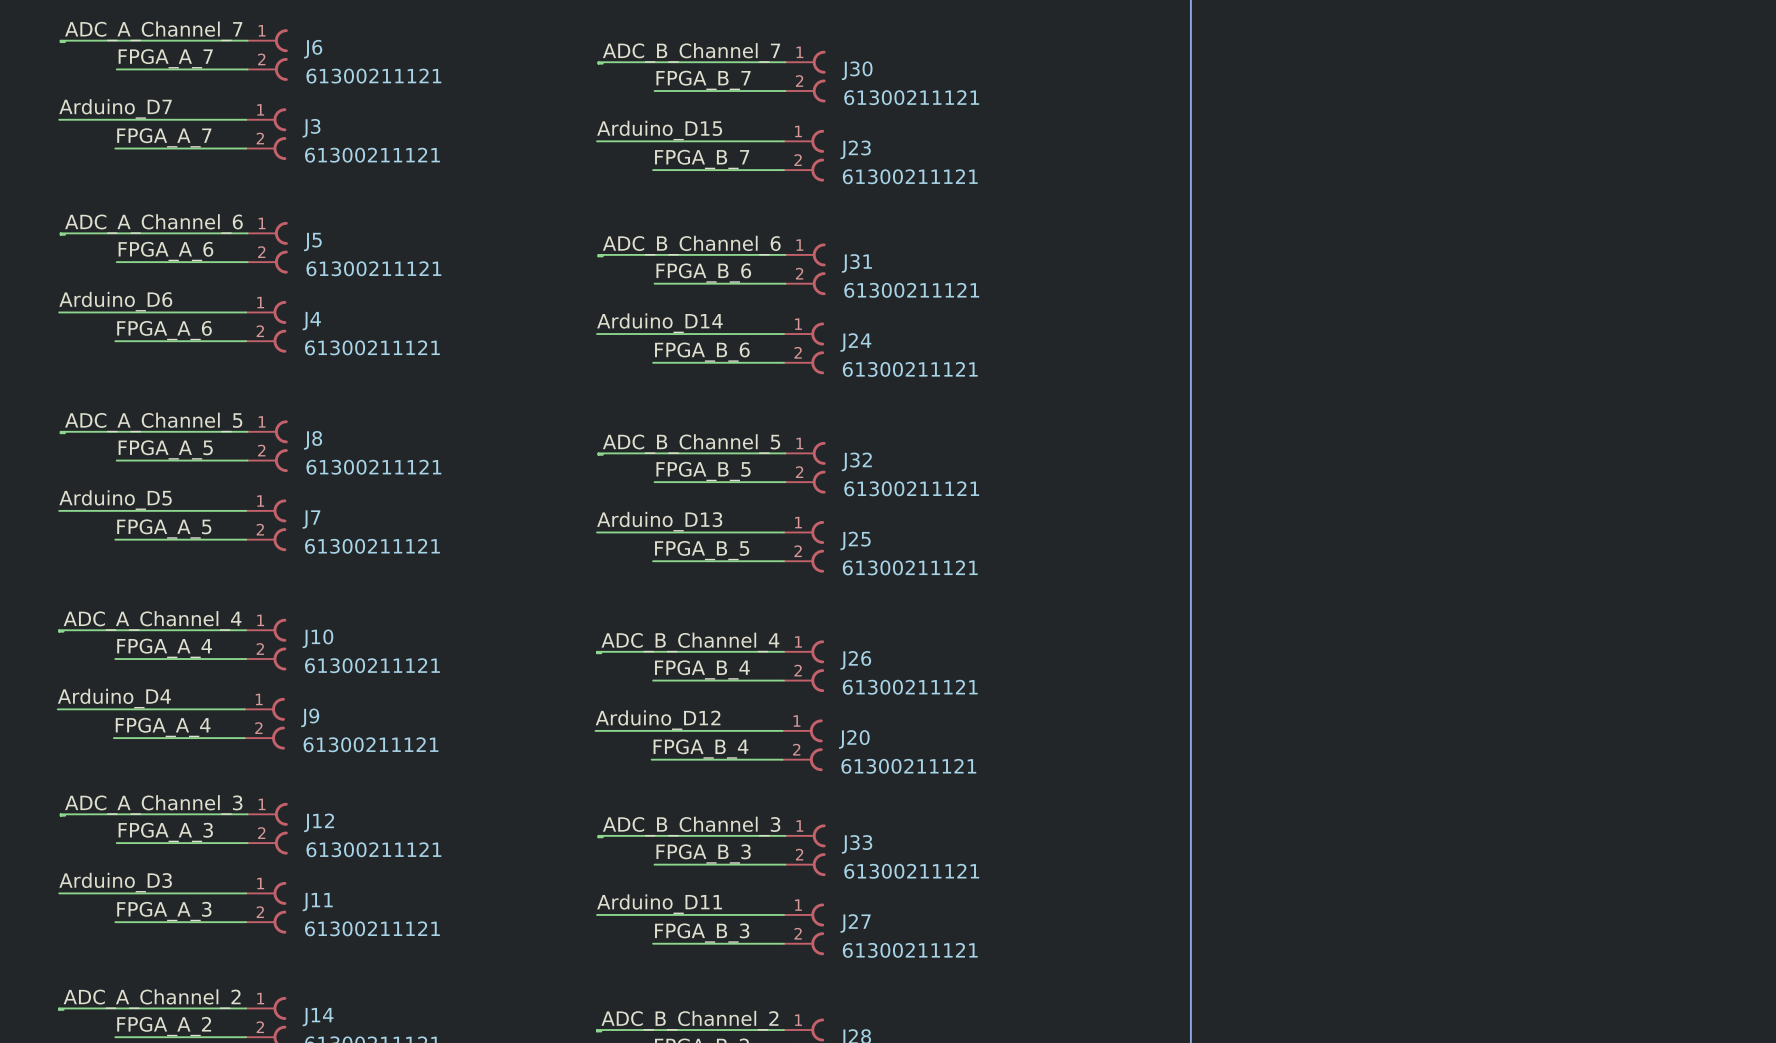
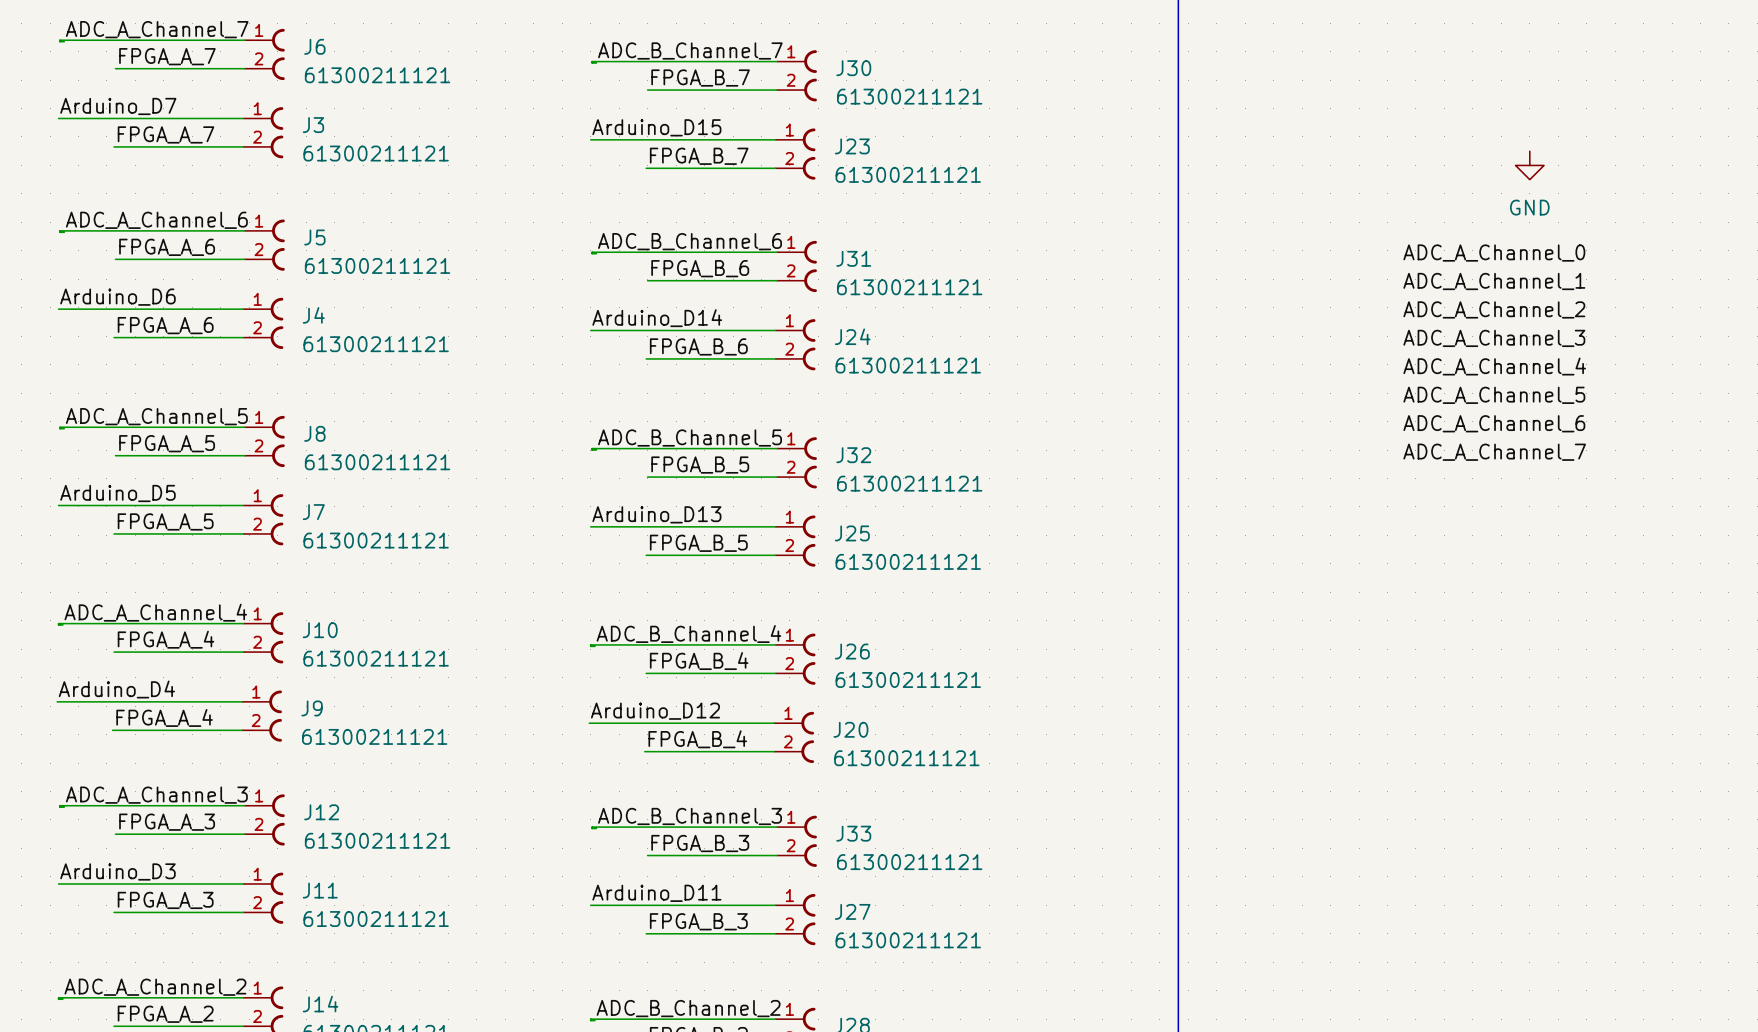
power symbol: none -> GND (1529, 165)
label: none -> ADC_A_Channel_0 (1494, 253)
label: none -> ADC_A_Channel_1 (1494, 281)
label: none -> ADC_A_Channel_2 (1494, 309)
label: none -> ADC_A_Channel_3 (1494, 338)
label: none -> ADC_A_Channel_4 (1494, 366)
label: none -> ADC_A_Channel_5 (1494, 395)
label: none -> ADC_A_Channel_6 (1494, 423)
label: none -> ADC_A_Channel_7 (1494, 452)

